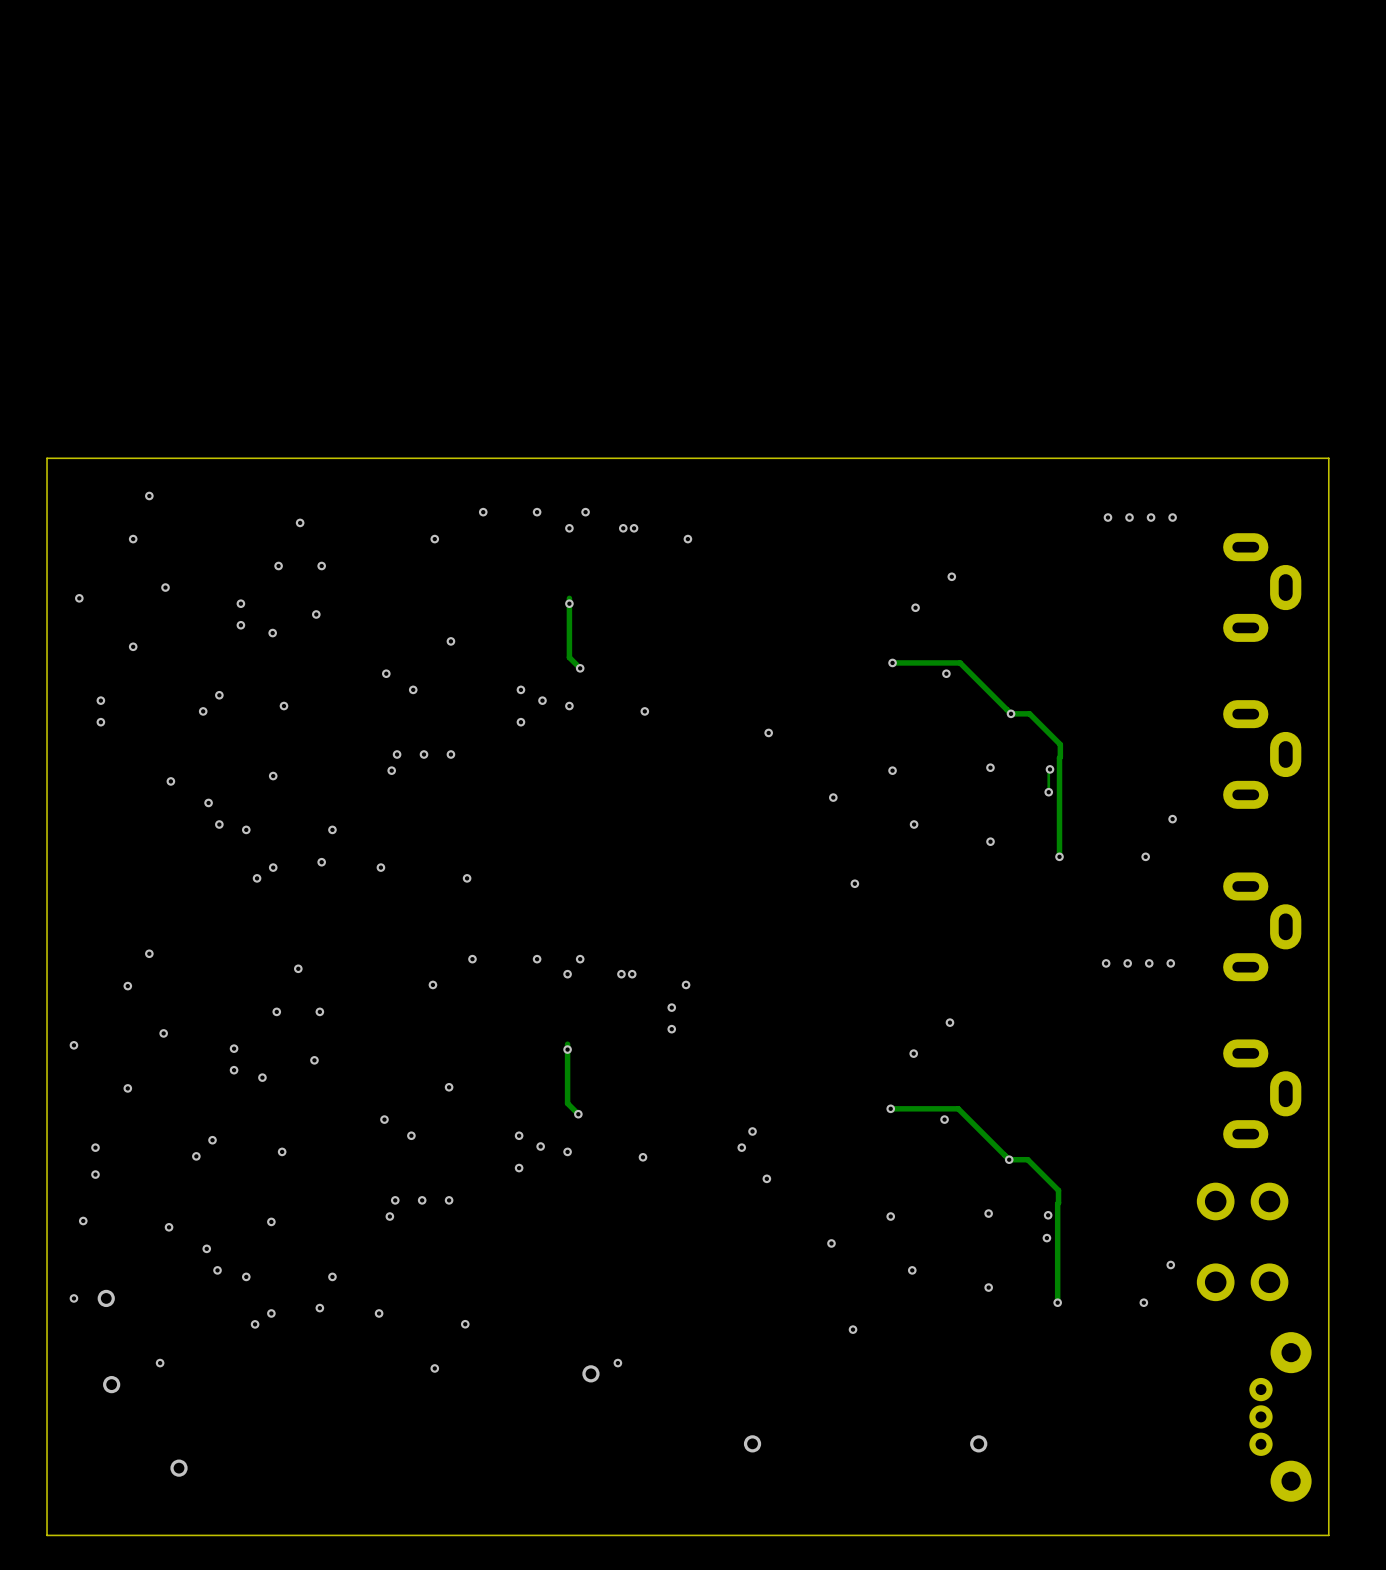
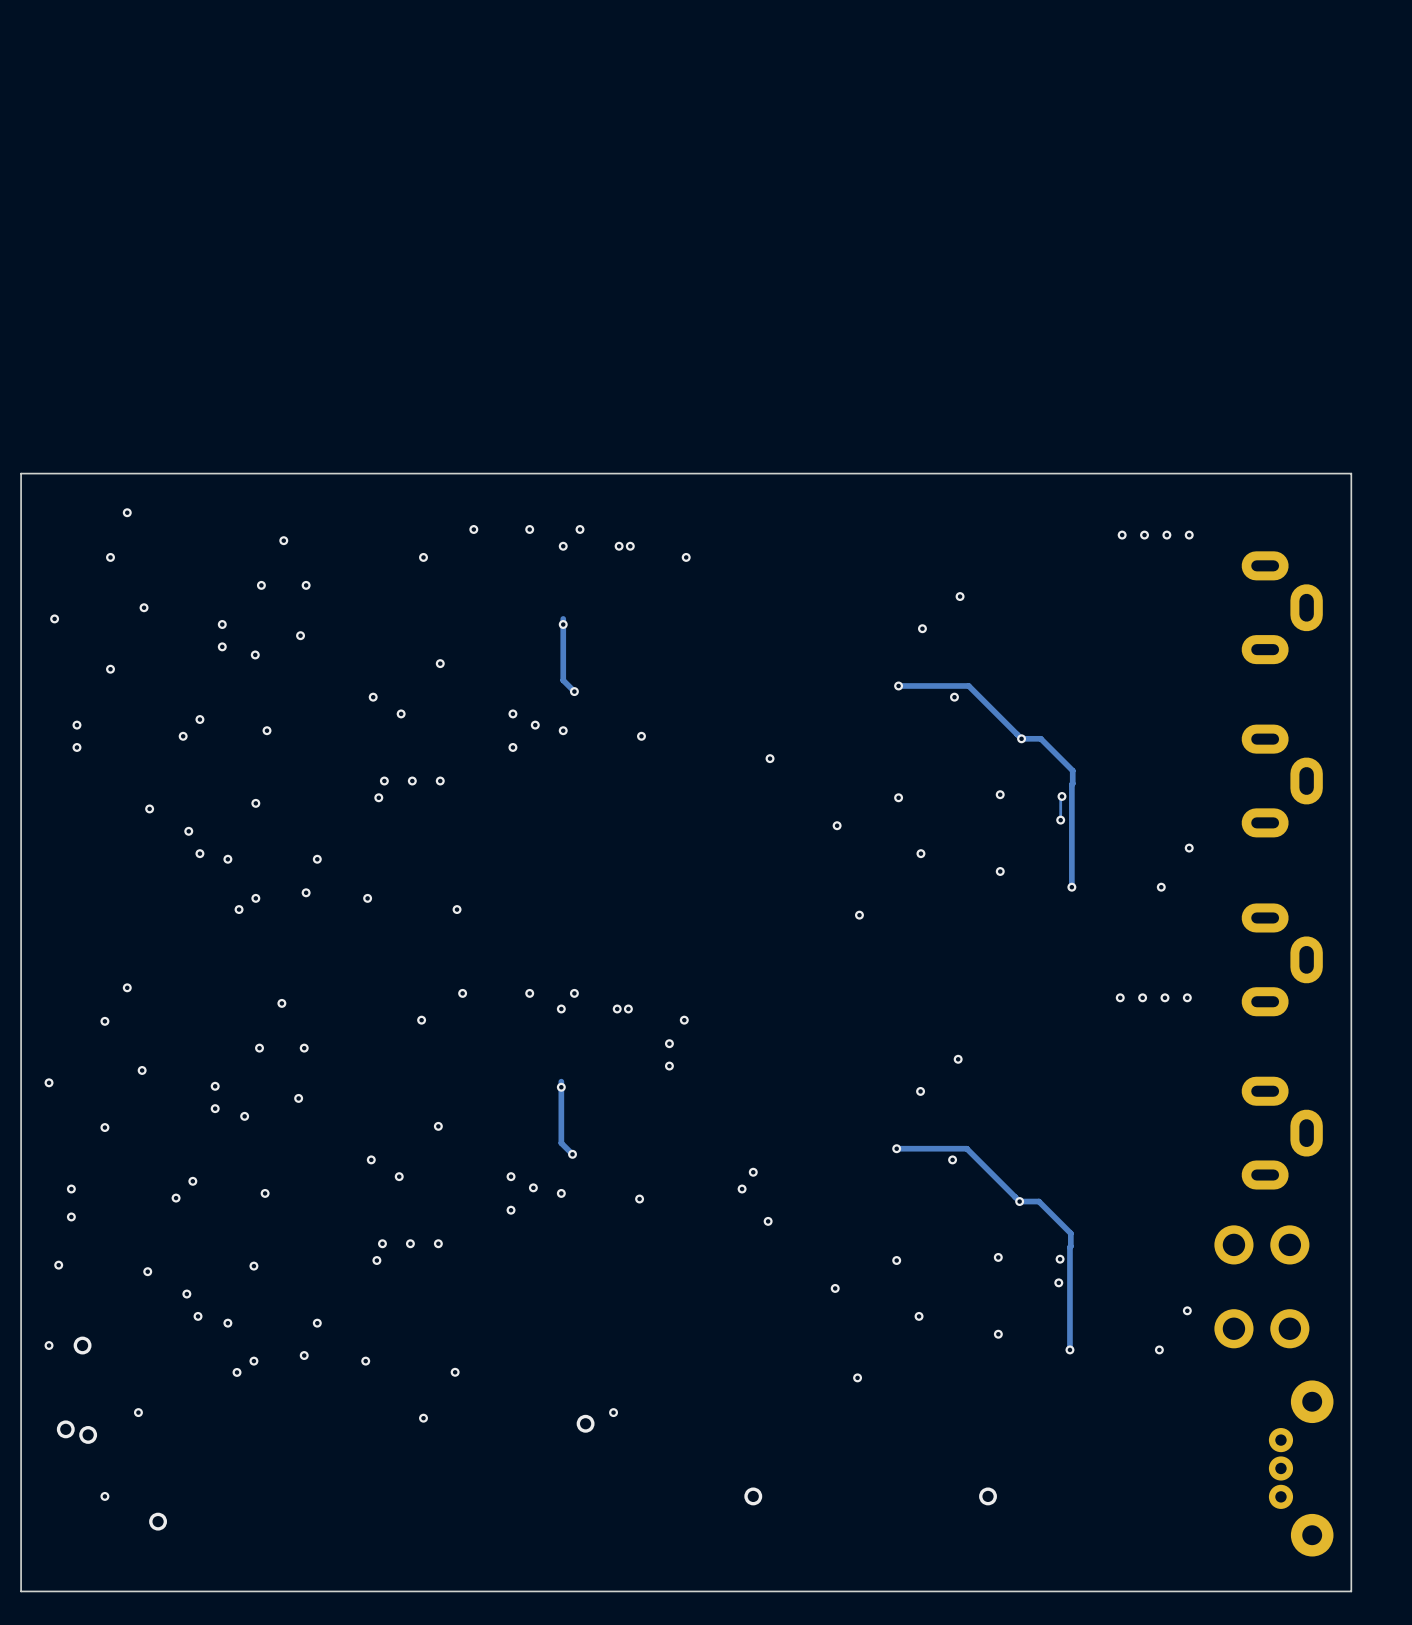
via: none -> (65, 1429)
via: none -> (104, 1496)

